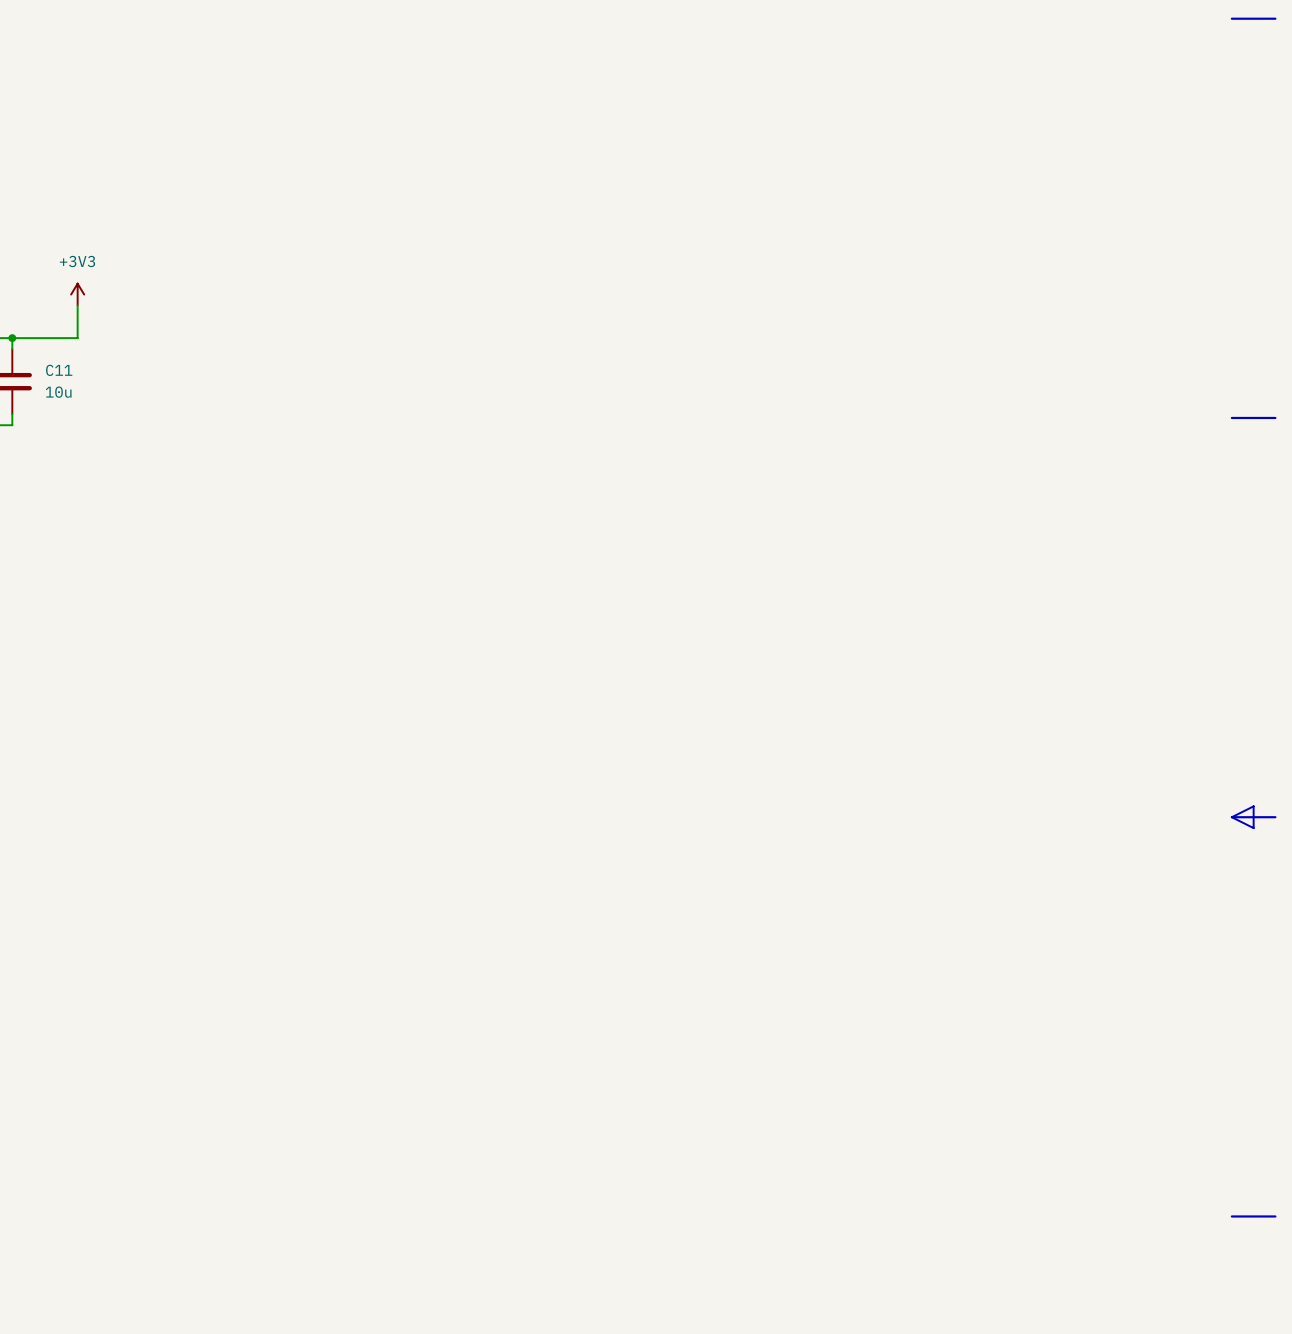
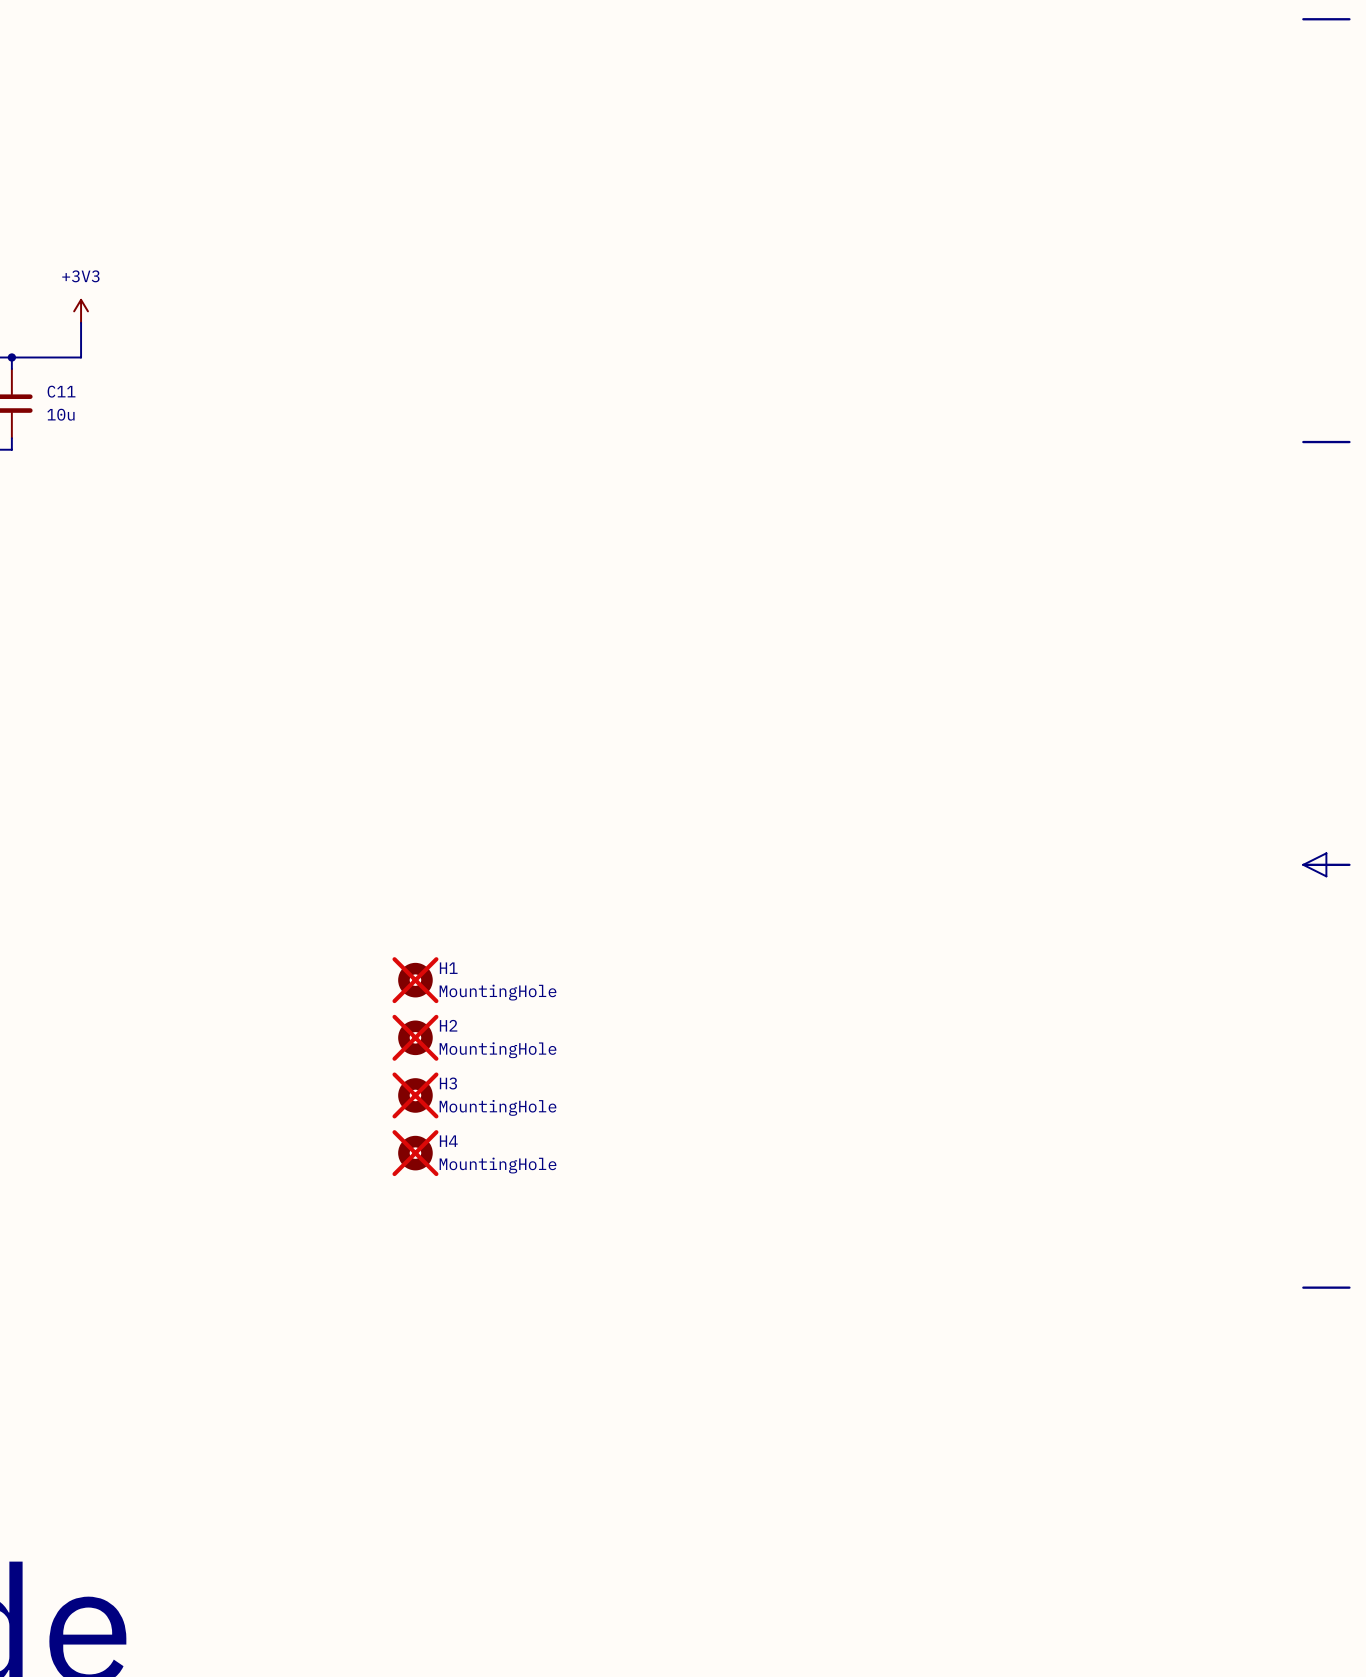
H1: none -> MountingHole (415, 980)
H2: none -> MountingHole (415, 1037)
H3: none -> MountingHole (415, 1095)
H4: none -> MountingHole (415, 1153)

